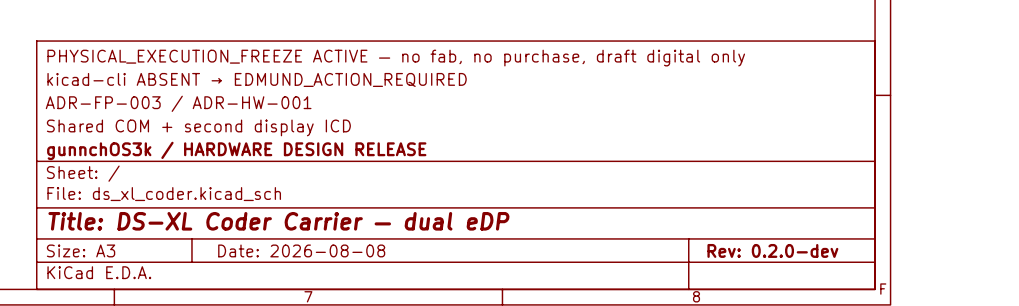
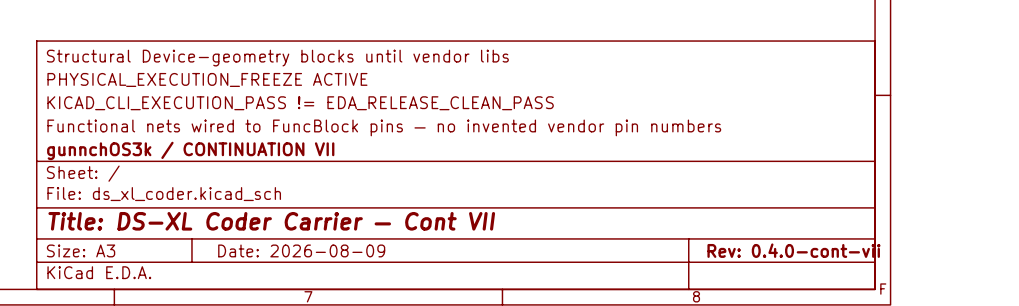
title block: PHYSICAL_EXECUTION_FREEZE ACTIVE — no fab, no purchase, draft digital only (396, 58) -> Structural Device-geometry blocks until vendor libs (277, 58)
title block: kicad-cli ABSENT → EDMUND_ACTION_REQUIRED (257, 79) -> PHYSICAL_EXECUTION_FREEZE ACTIVE (207, 79)
title block: ADR-FP-003 / ADR-HW-001 (178, 103) -> KICAD_CLI_EXECUTION_PASS != EDA_RELEASE_CLEAN_PASS (300, 103)
title block: Shared COM + second display ICD (198, 127) -> Functional nets wired to FuncBlock pins — no invented vendor pin numbers (384, 127)
title block: gunnchOS3k / HARDWARE DESIGN RELEASE (236, 150) -> gunnchOS3k / CONTINUATION VII (190, 150)
title block: Title: DS-XL Coder Carrier — dual eDP (278, 221) -> Title: DS-XL Coder Carrier — Cont VII (271, 221)
title block: Date: 2026-08-08 (301, 250) -> Date: 2026-08-09 (301, 250)
title block: Rev: 0.2.0-dev (772, 250) -> Rev: 0.4.0-cont-vii (793, 250)

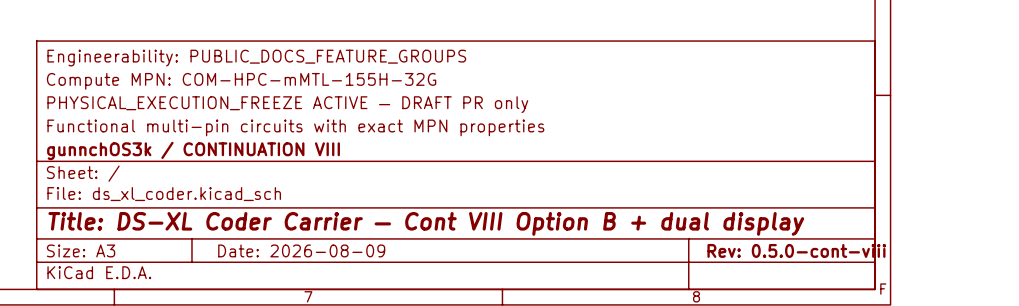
title block: Structural Device-geometry blocks until vendor libs (277, 58) -> Engineerability: PUBLIC_DOCS_FEATURE_GROUPS (256, 58)
title block: PHYSICAL_EXECUTION_FREEZE ACTIVE (207, 79) -> Compute MPN: COM-HPC-mMTL-155H-32G (241, 81)
title block: KICAD_CLI_EXECUTION_PASS != EDA_RELEASE_CLEAN_PASS (300, 103) -> PHYSICAL_EXECUTION_FREEZE ACTIVE — DRAFT PR only (287, 104)
title block: Functional nets wired to FuncBlock pins — no invented vendor pin numbers (384, 127) -> Functional multi-pin circuits with exact MPN properties (295, 127)
title block: gunnchOS3k / CONTINUATION VII (190, 150) -> gunnchOS3k / CONTINUATION VIII (193, 150)
title block: Title: DS-XL Coder Carrier — Cont VII (271, 221) -> Title: DS-XL Coder Carrier — Cont VIII Option B + dual display (426, 223)
title block: Rev: 0.4.0-cont-vii (793, 250) -> Rev: 0.5.0-cont-viii (796, 250)

